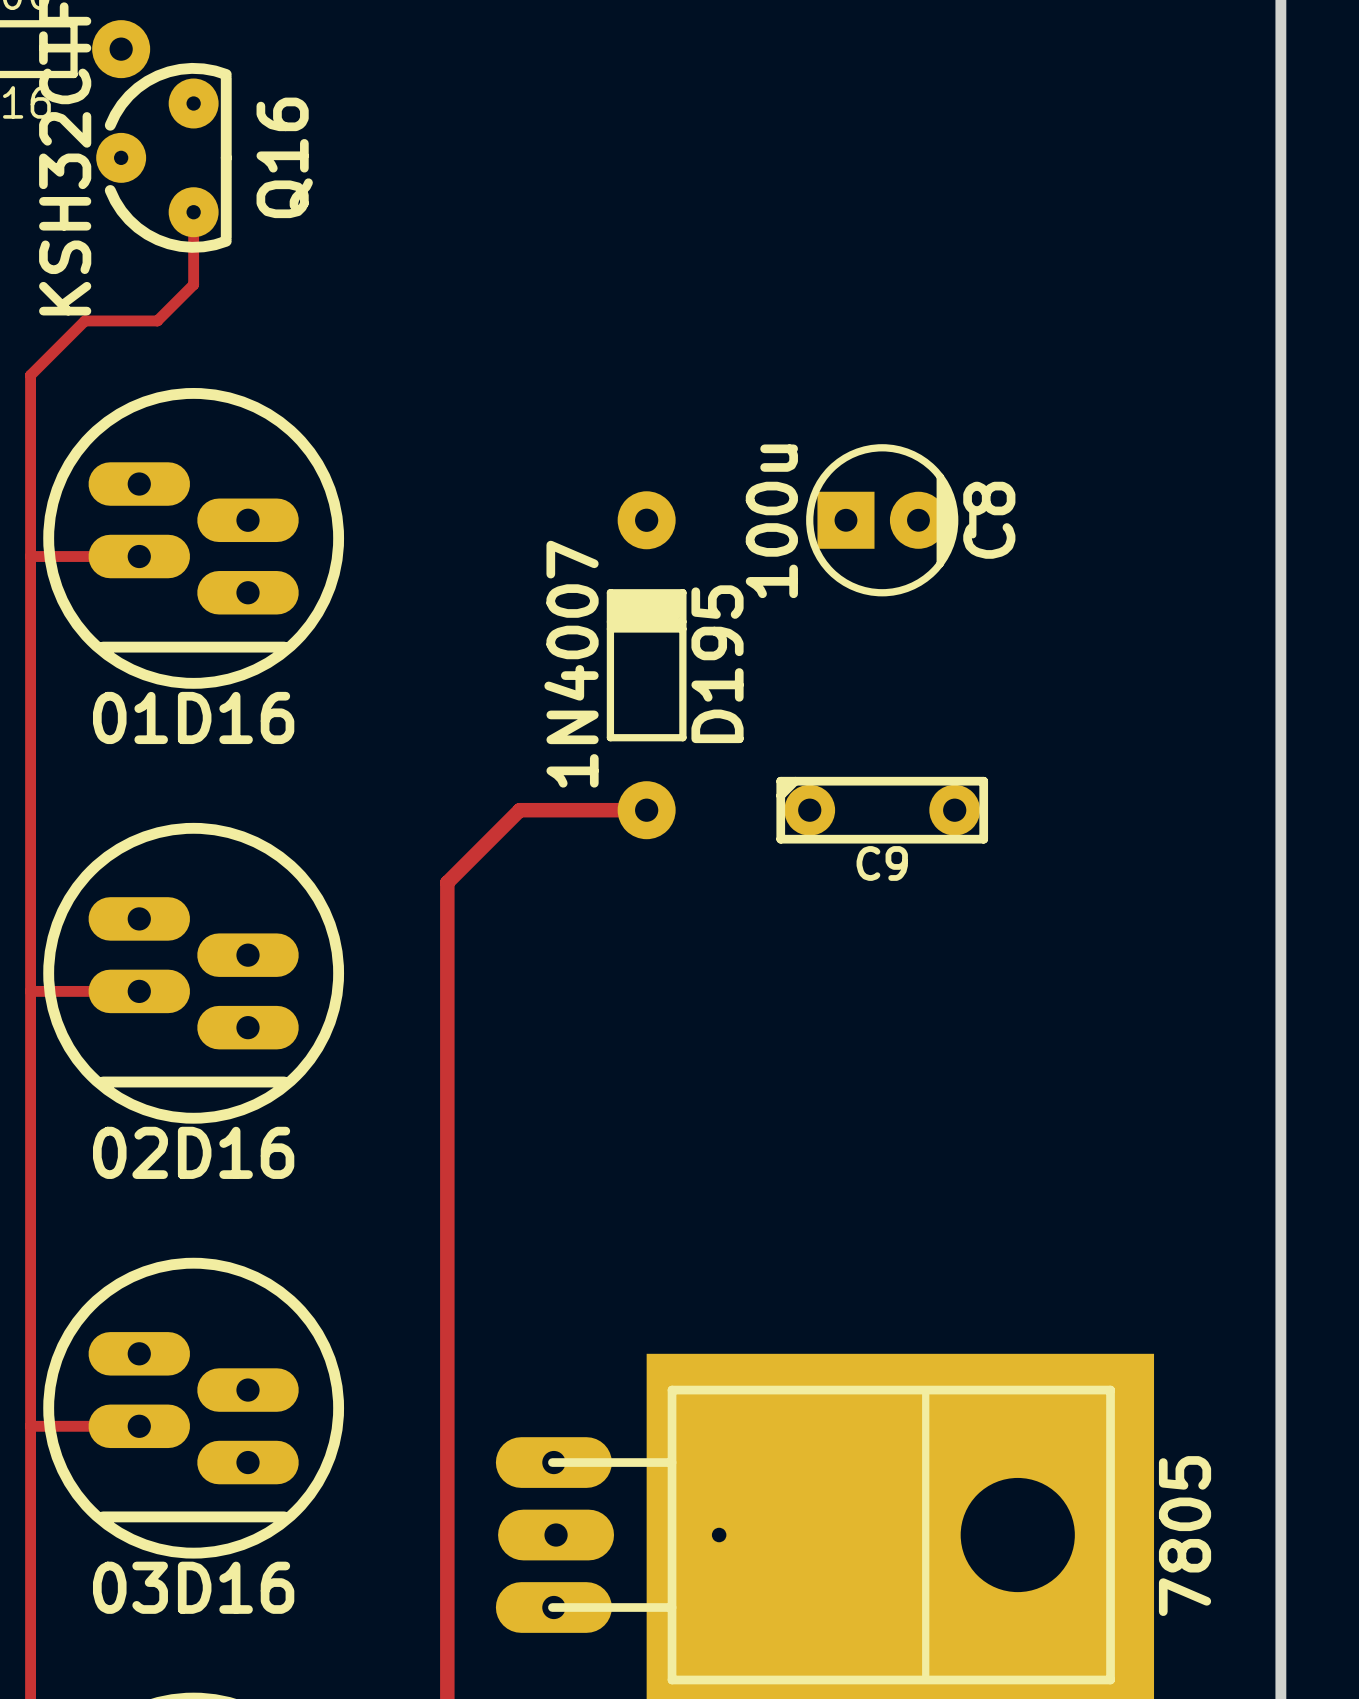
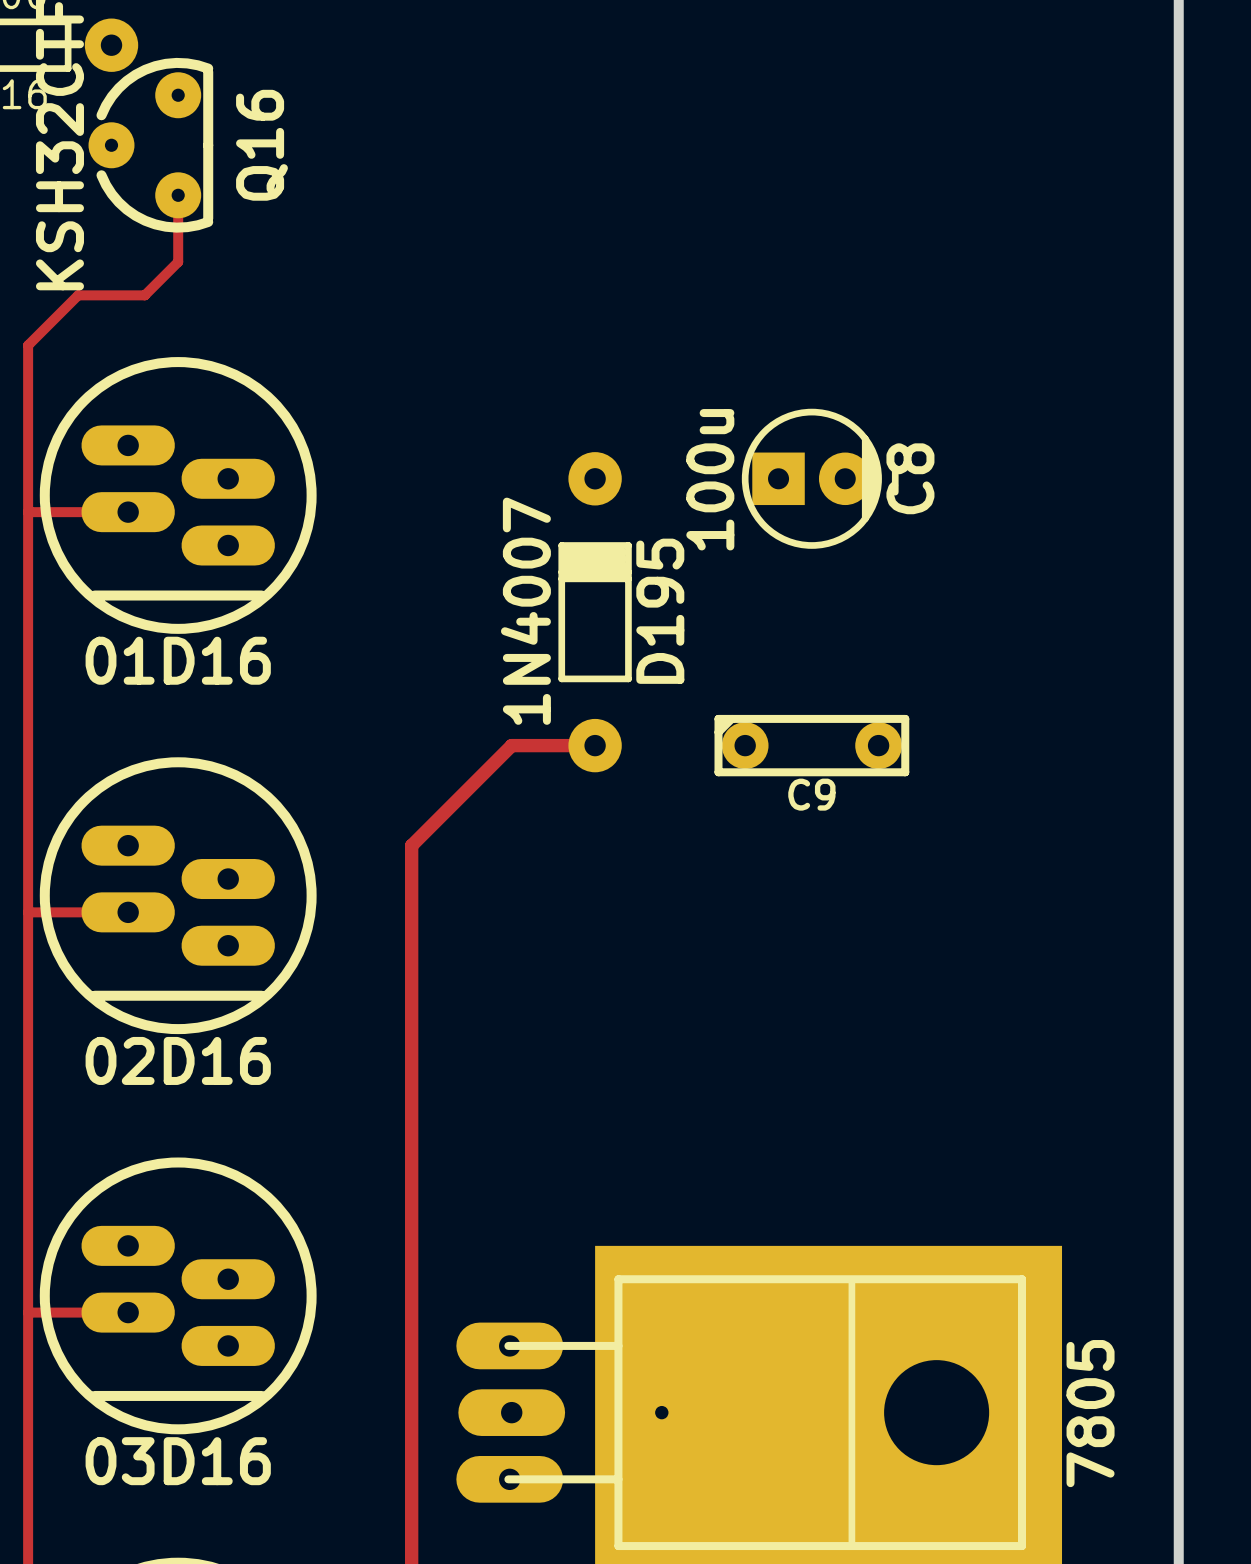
track: (556, 810) (519, 810) (447, 882) (447, 918) -> (511, 745) (411, 845)

